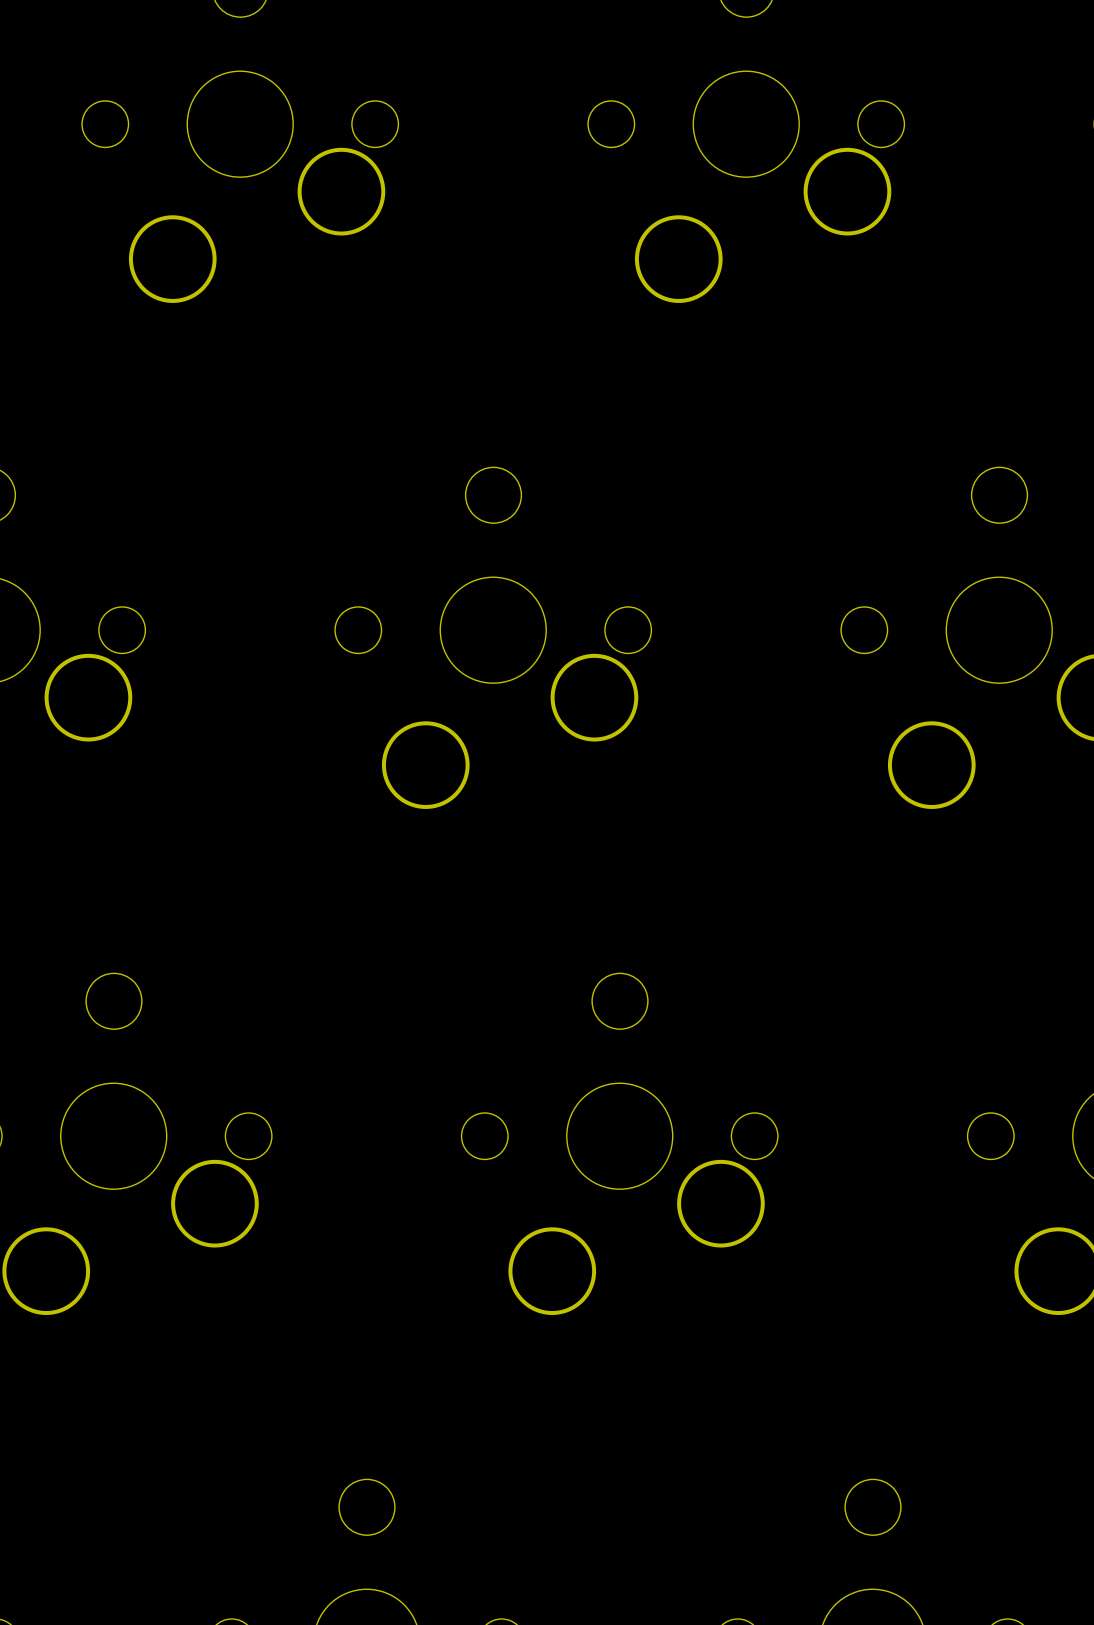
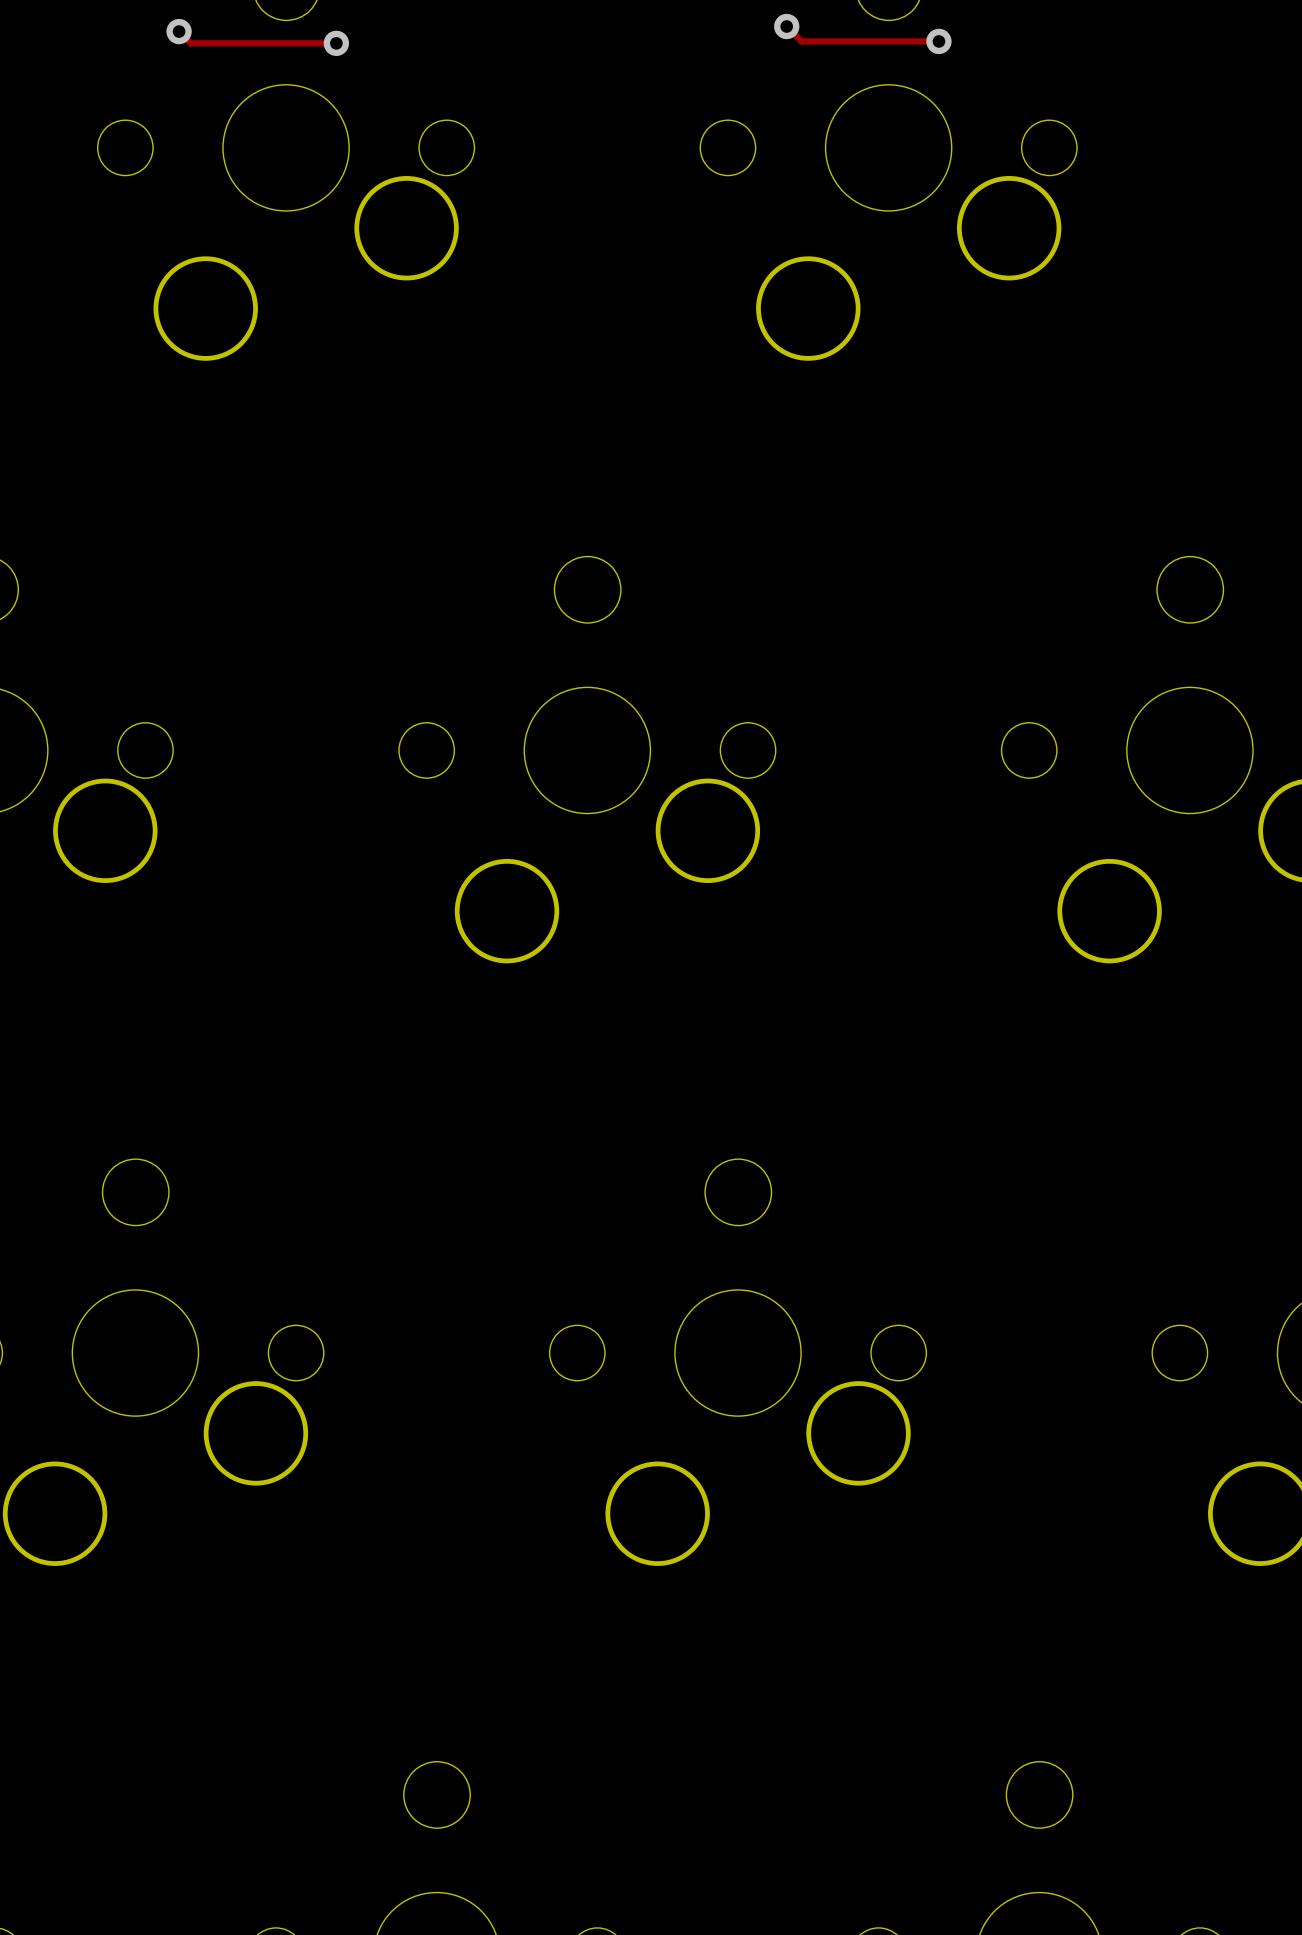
track: none -> (786, 26) (801, 41) (938, 41)
via: none -> (786, 26)
track: none -> (179, 31) (190, 43) (336, 43)
via: none -> (179, 31)
via: none -> (938, 41)
via: none -> (336, 43)

